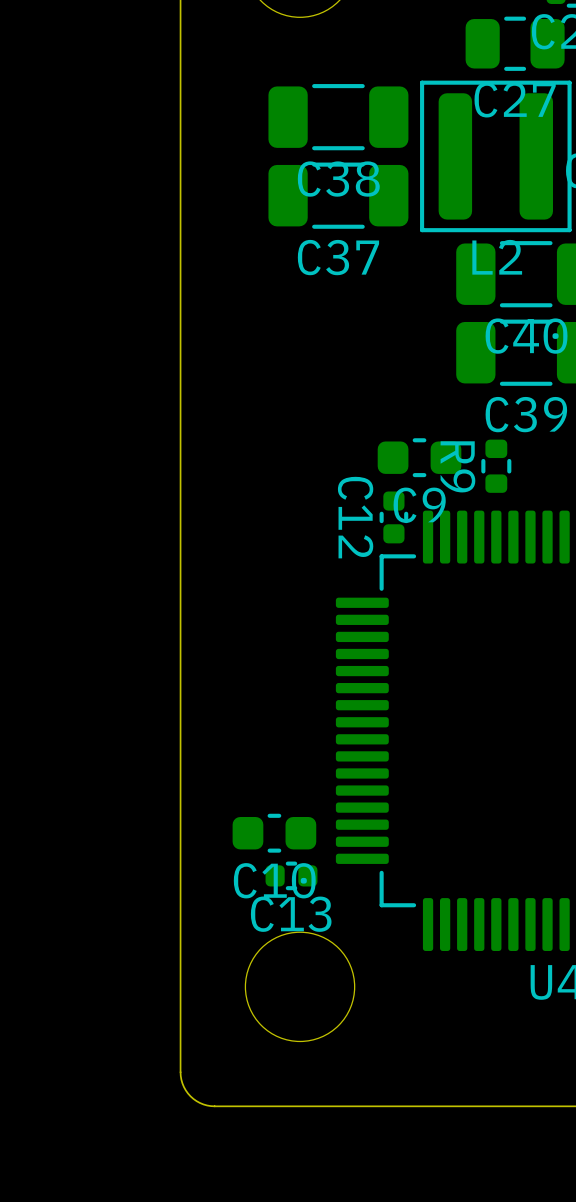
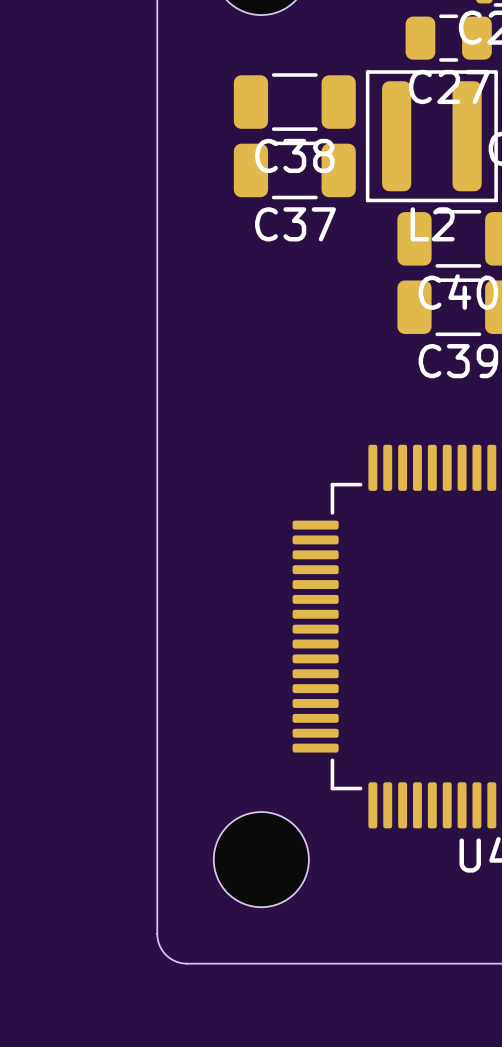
C9: (419, 457) -> none
R9: (496, 466) -> none
C12: (393, 517) -> none
C10: (274, 833) -> none
C13: (291, 875) -> none

